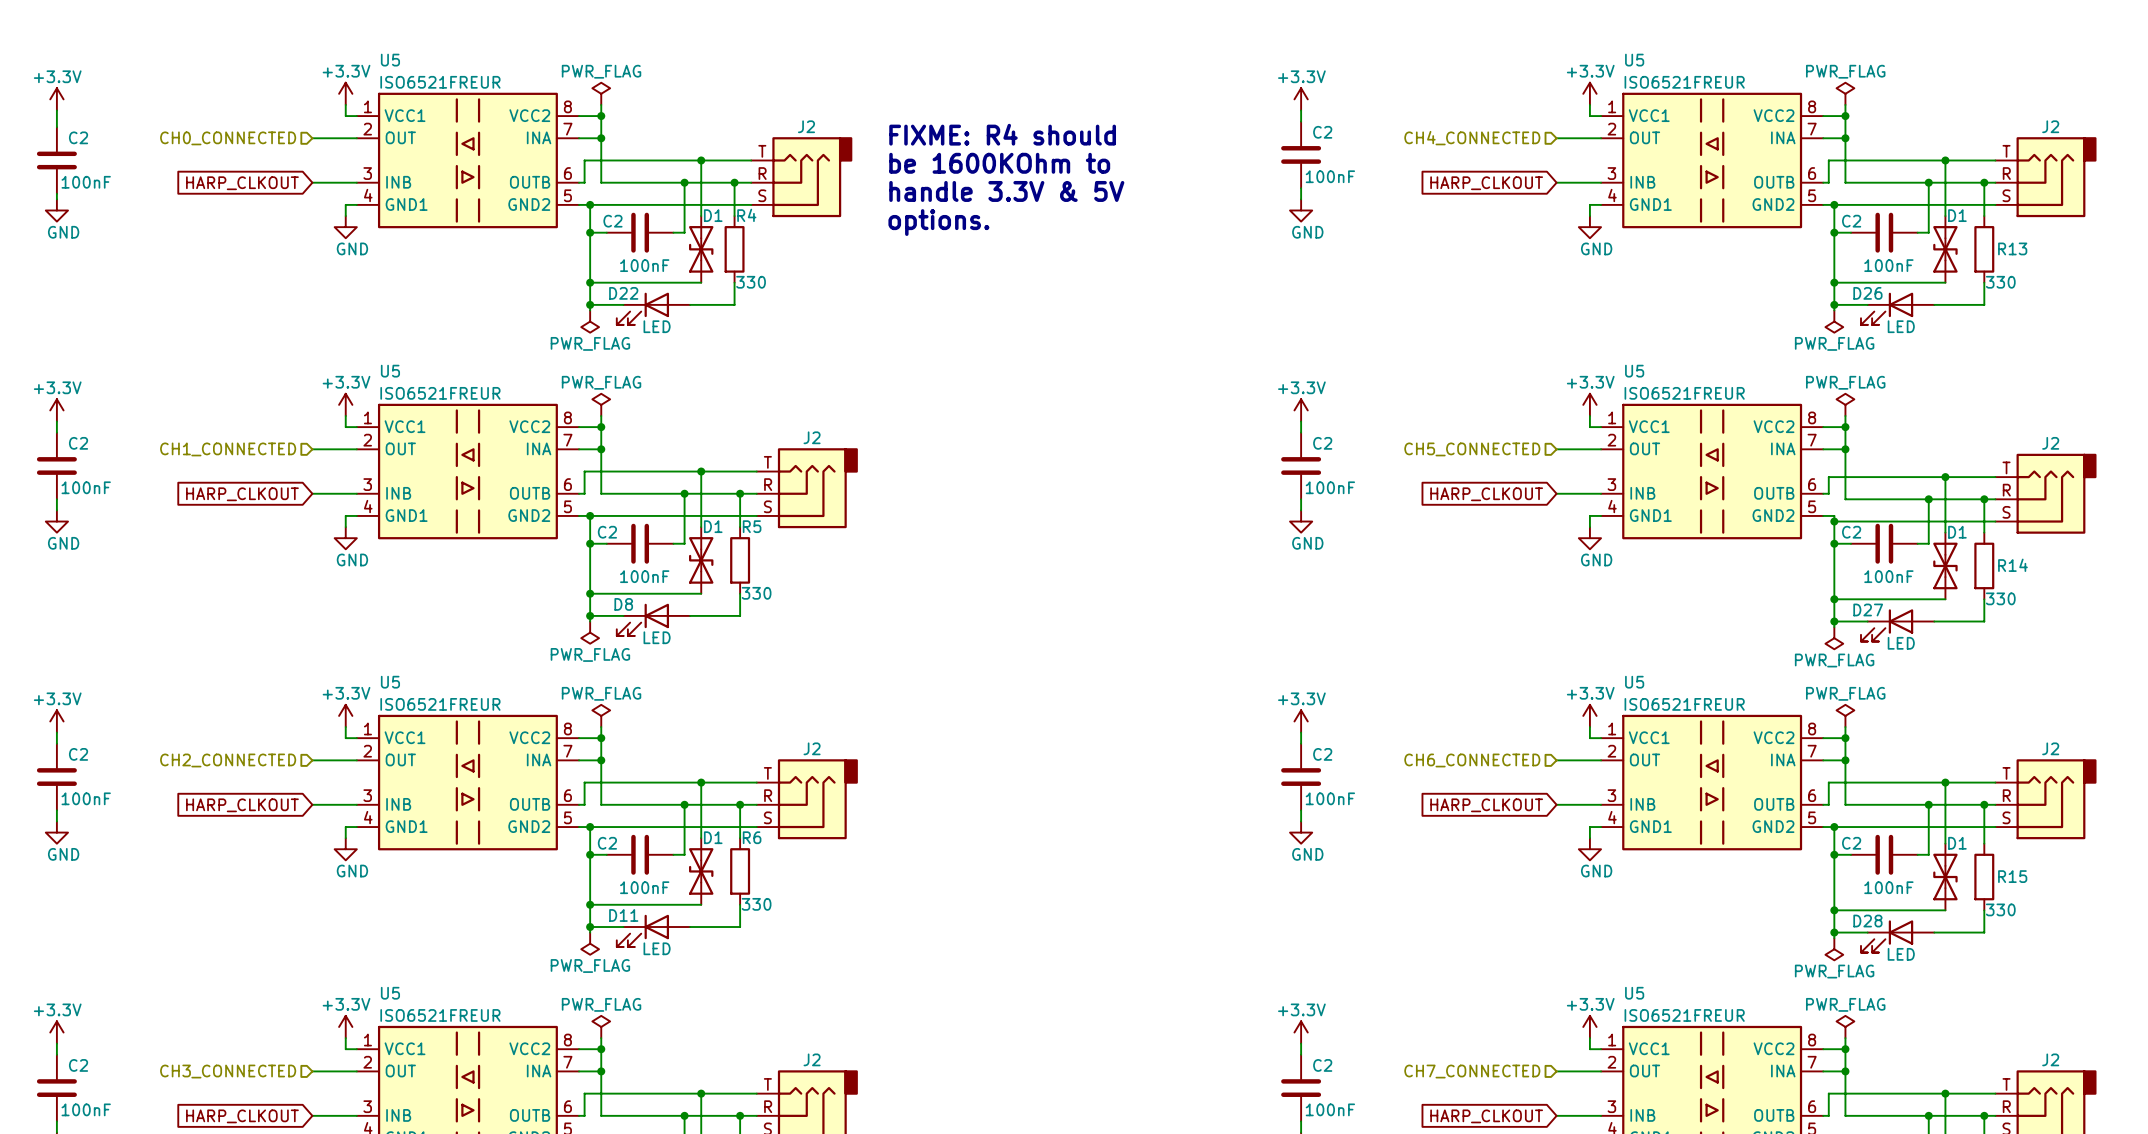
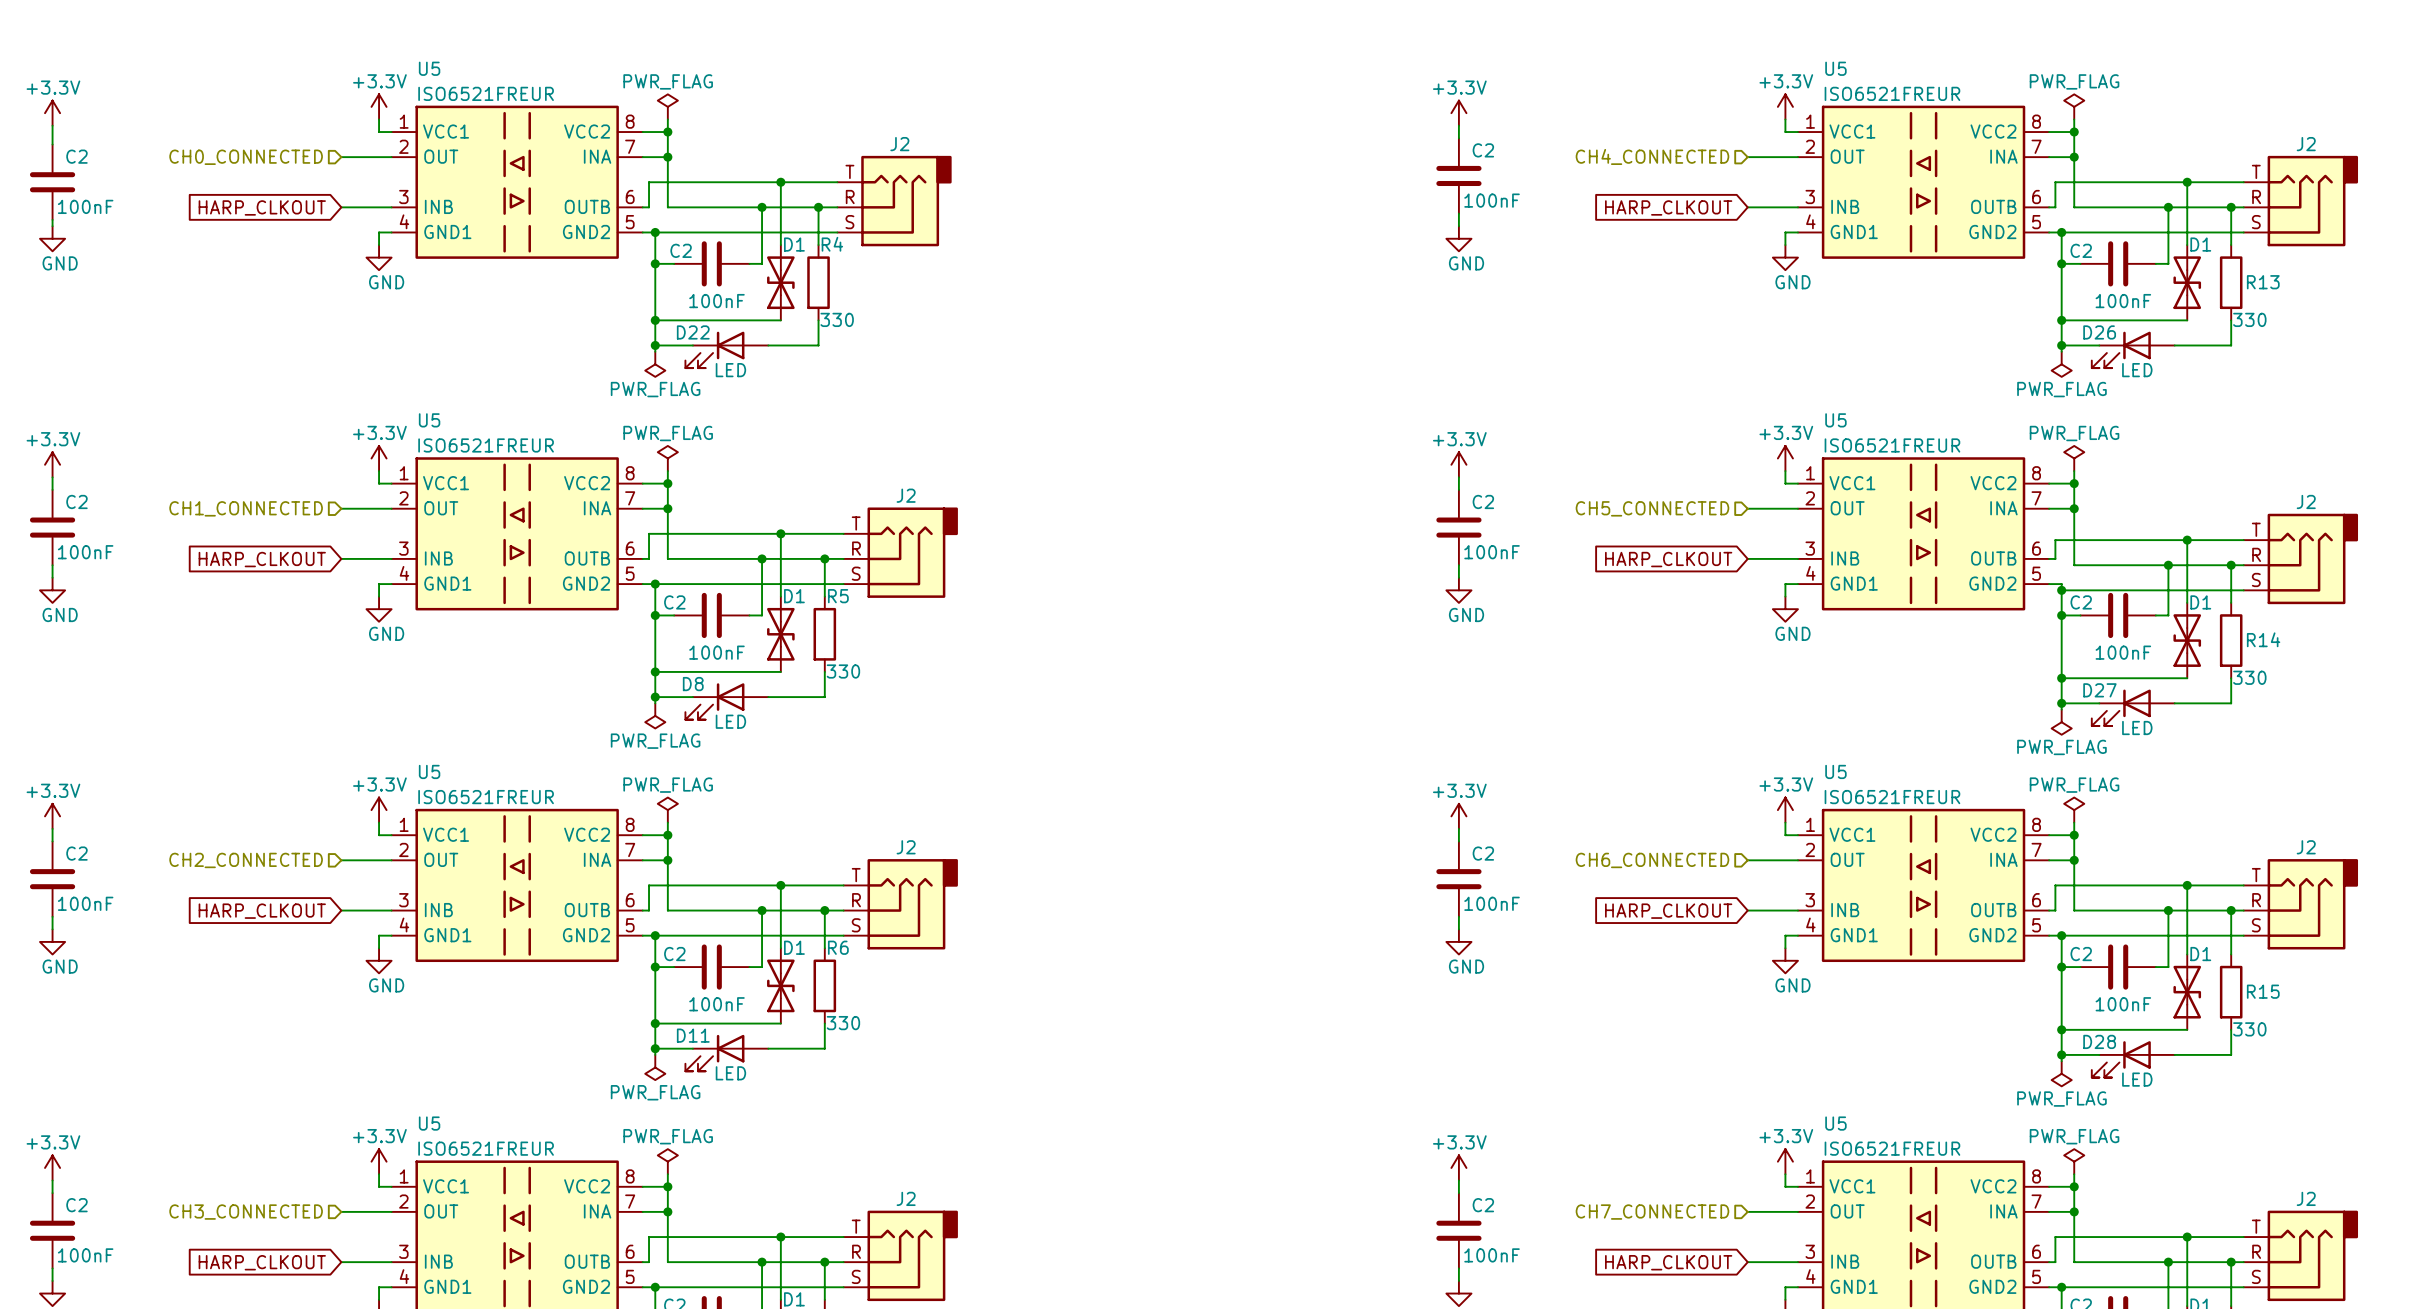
text: FIXME: R4 should (1002, 134) -> none
text: be 1600KOhm to (999, 163) -> none
text: handle 3.3V & 5V (1006, 191) -> none
text: options. (938, 222) -> none

